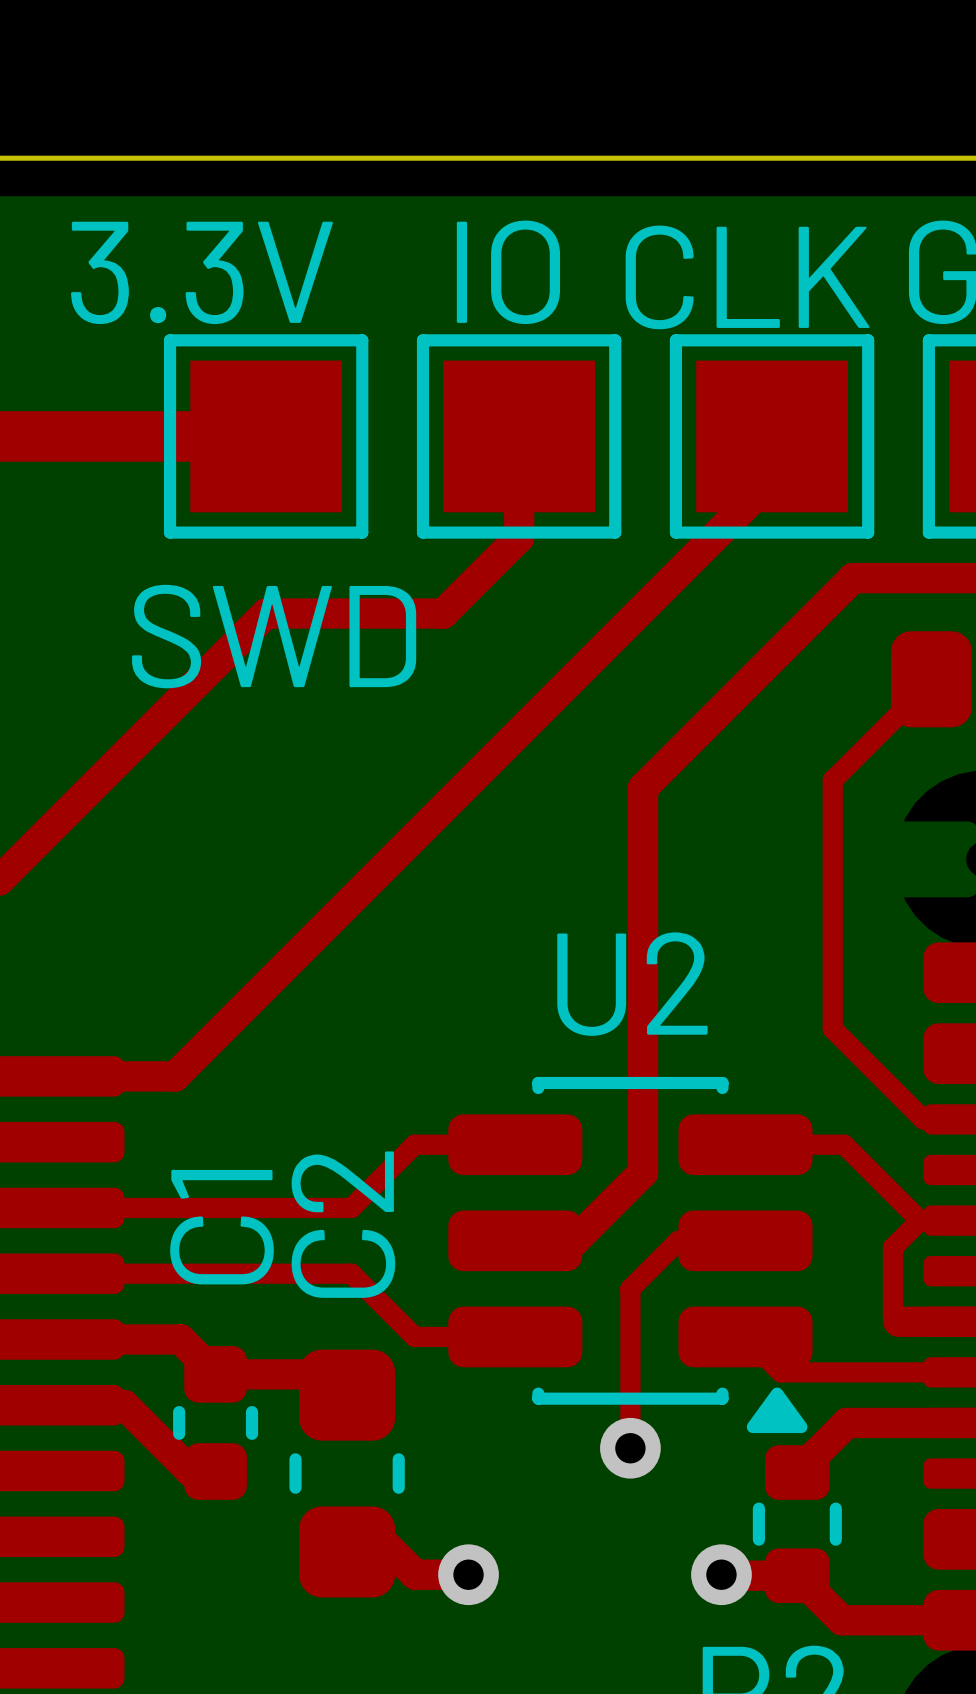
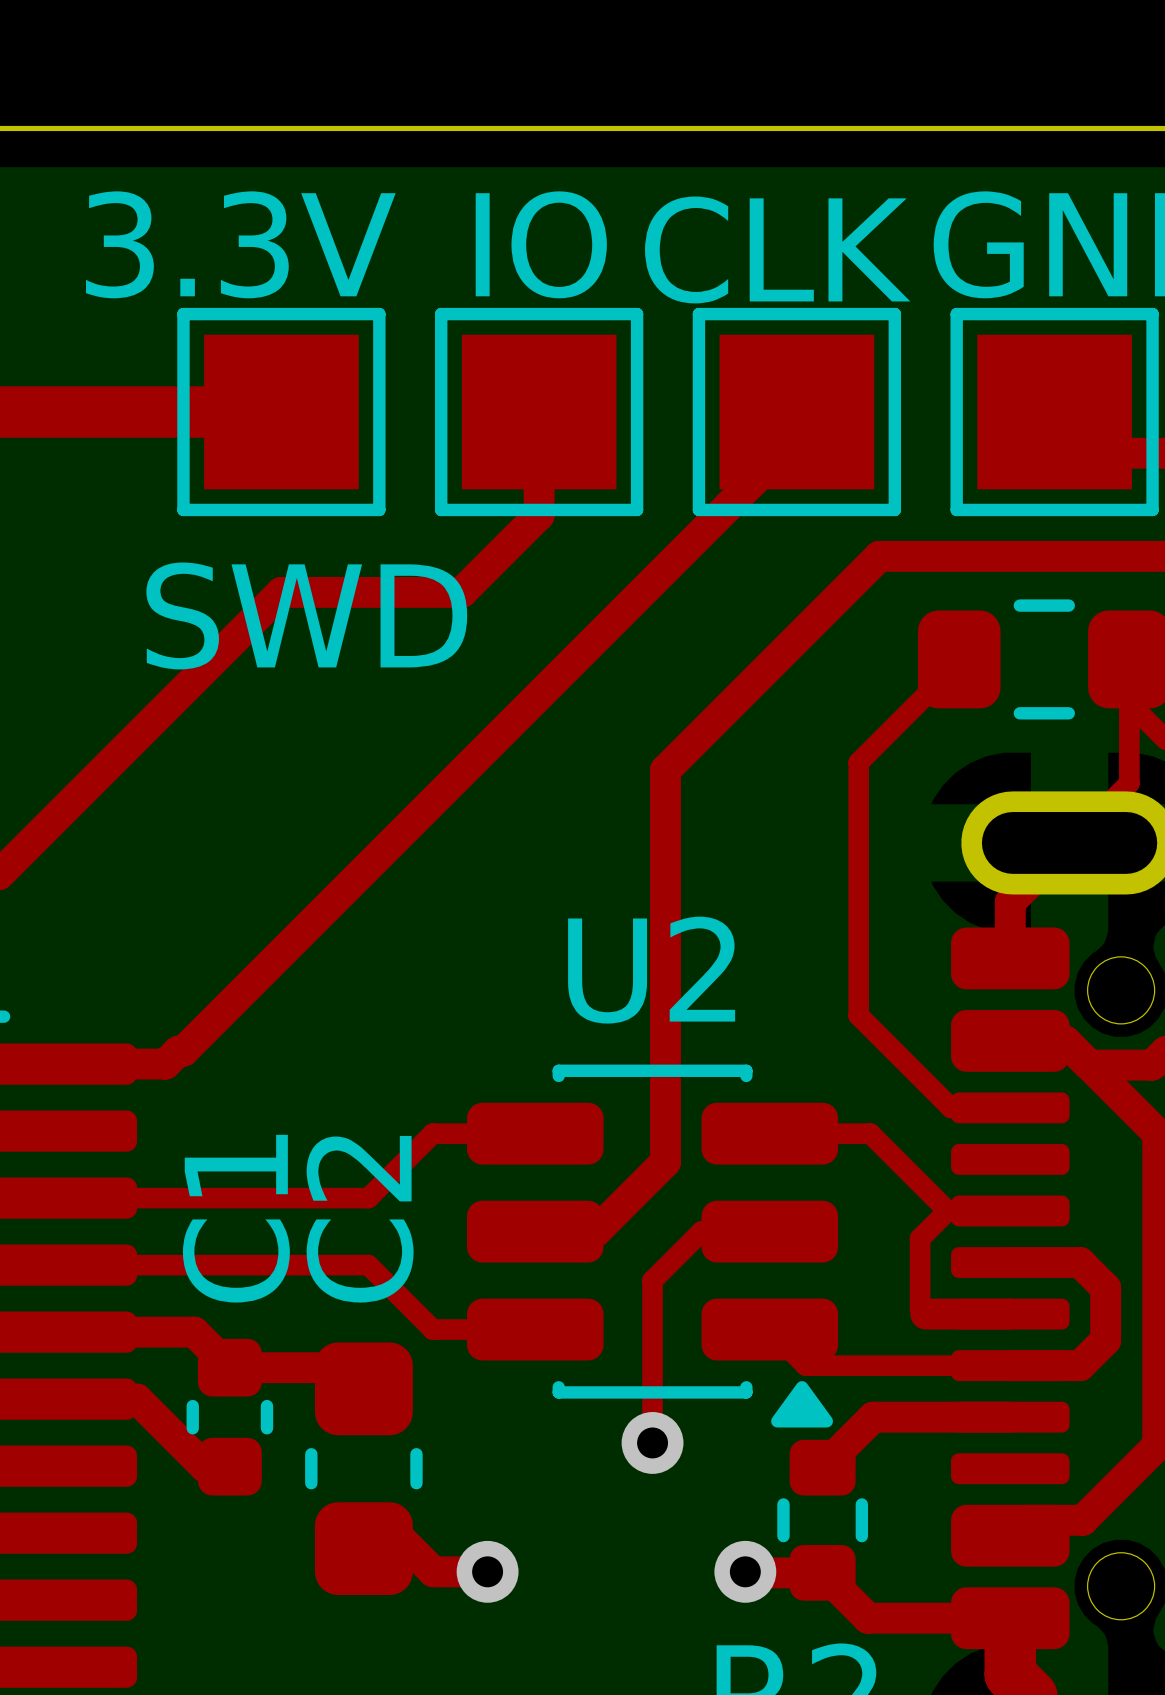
top track: (772, 461) (772, 479) (175, 1076) (152, 1076) -> (796, 437) (183, 1051) (178, 1051) (165, 1064)

